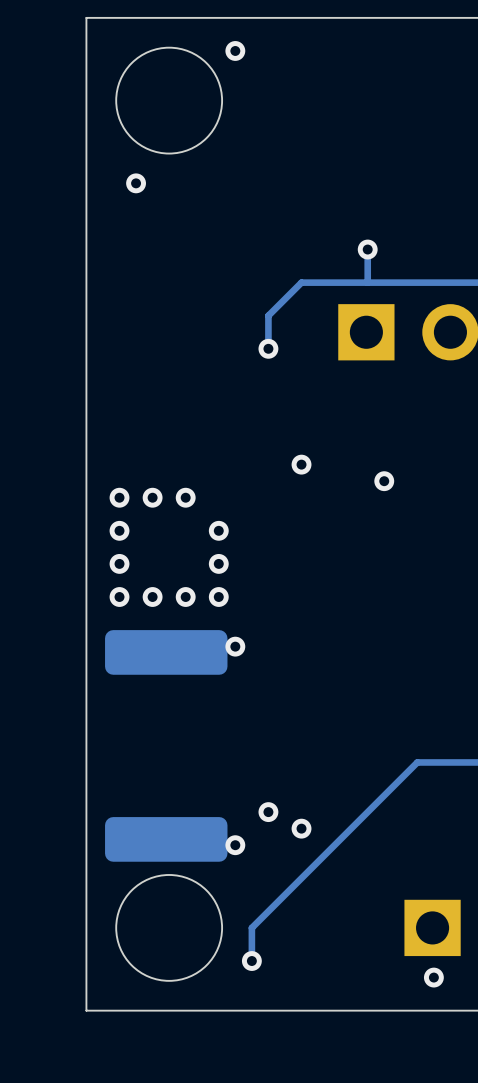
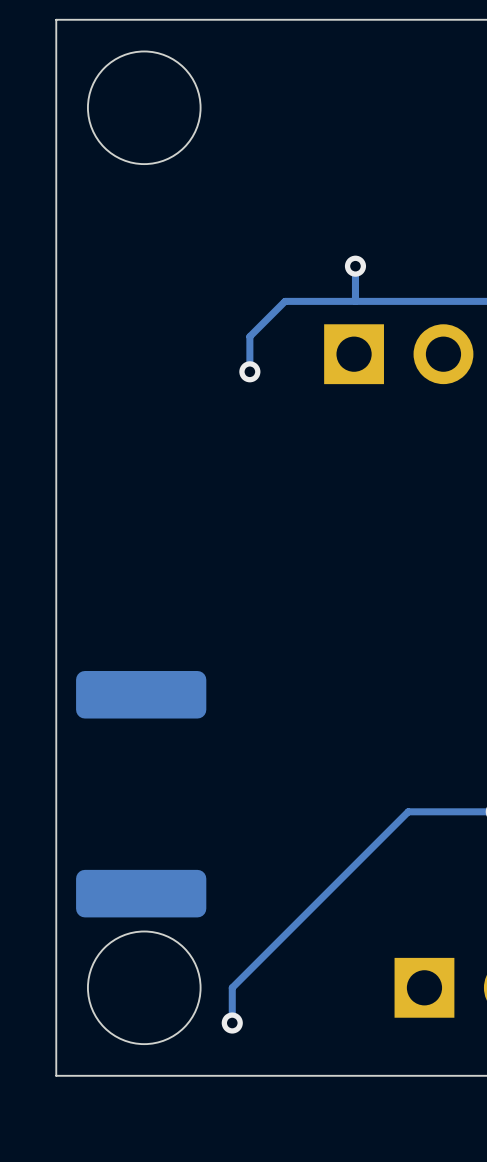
via: (235, 50) -> none
via: (136, 183) -> none
via: (301, 464) -> none
via: (384, 481) -> none
via: (119, 497) -> none
via: (152, 497) -> none
via: (185, 497) -> none
via: (119, 530) -> none
via: (218, 530) -> none
via: (119, 563) -> none
via: (218, 563) -> none
via: (119, 597) -> none
via: (152, 597) -> none
via: (185, 597) -> none
via: (218, 597) -> none
via: (235, 646) -> none
via: (268, 812) -> none
via: (301, 828) -> none
via: (235, 845) -> none
via: (433, 977) -> none

